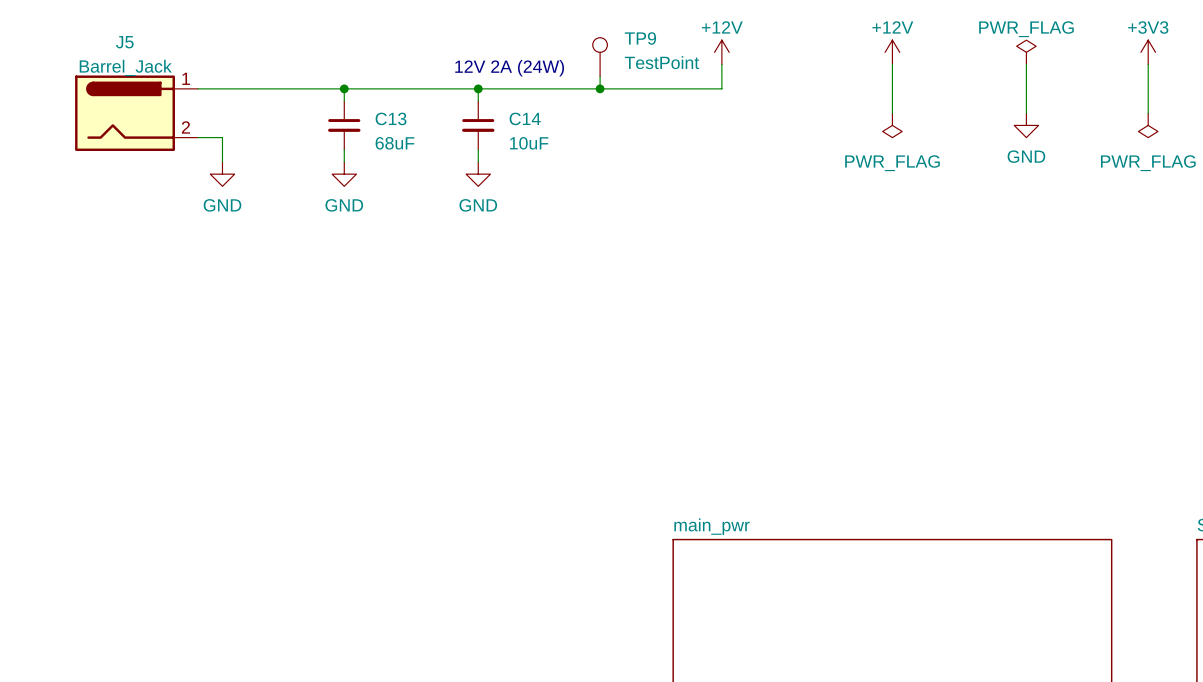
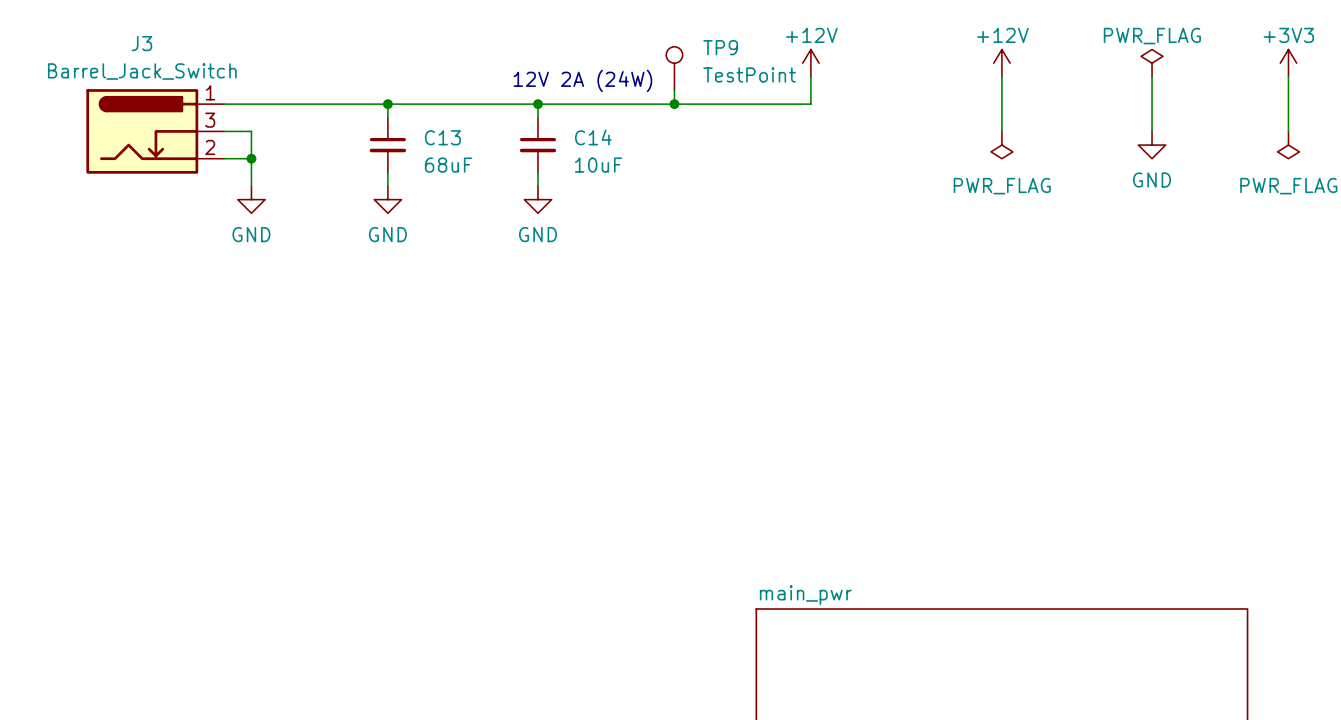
J5: Barrel_Jack (136, 113) -> none
J3: none -> Barrel_Jack_Switch (155, 131)
wire: none -> (224, 131) (251, 131) (251, 158)
junction: none -> (251, 158)

